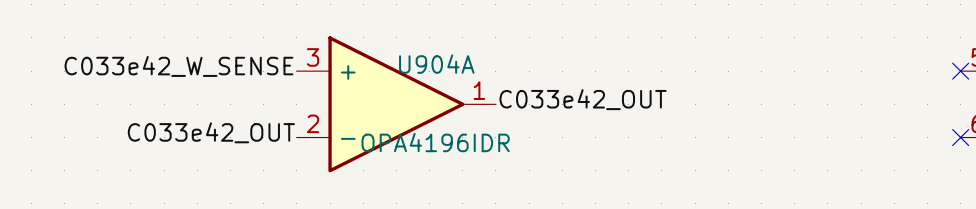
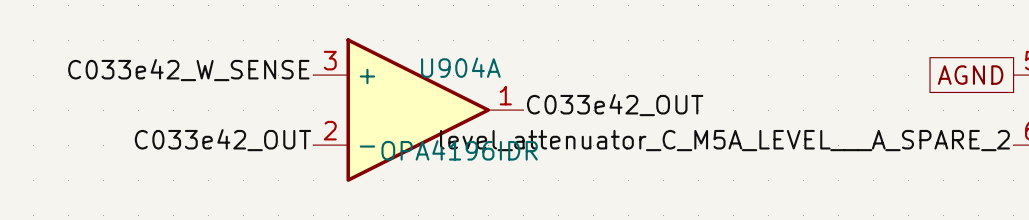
global label: none -> AGND (970, 75)
no-connect mark: (960, 71) -> none
label: none -> level_attenuator_C_M5A_LEVEL___A_SPARE_2 (724, 140)
no-connect mark: (960, 137) -> none

